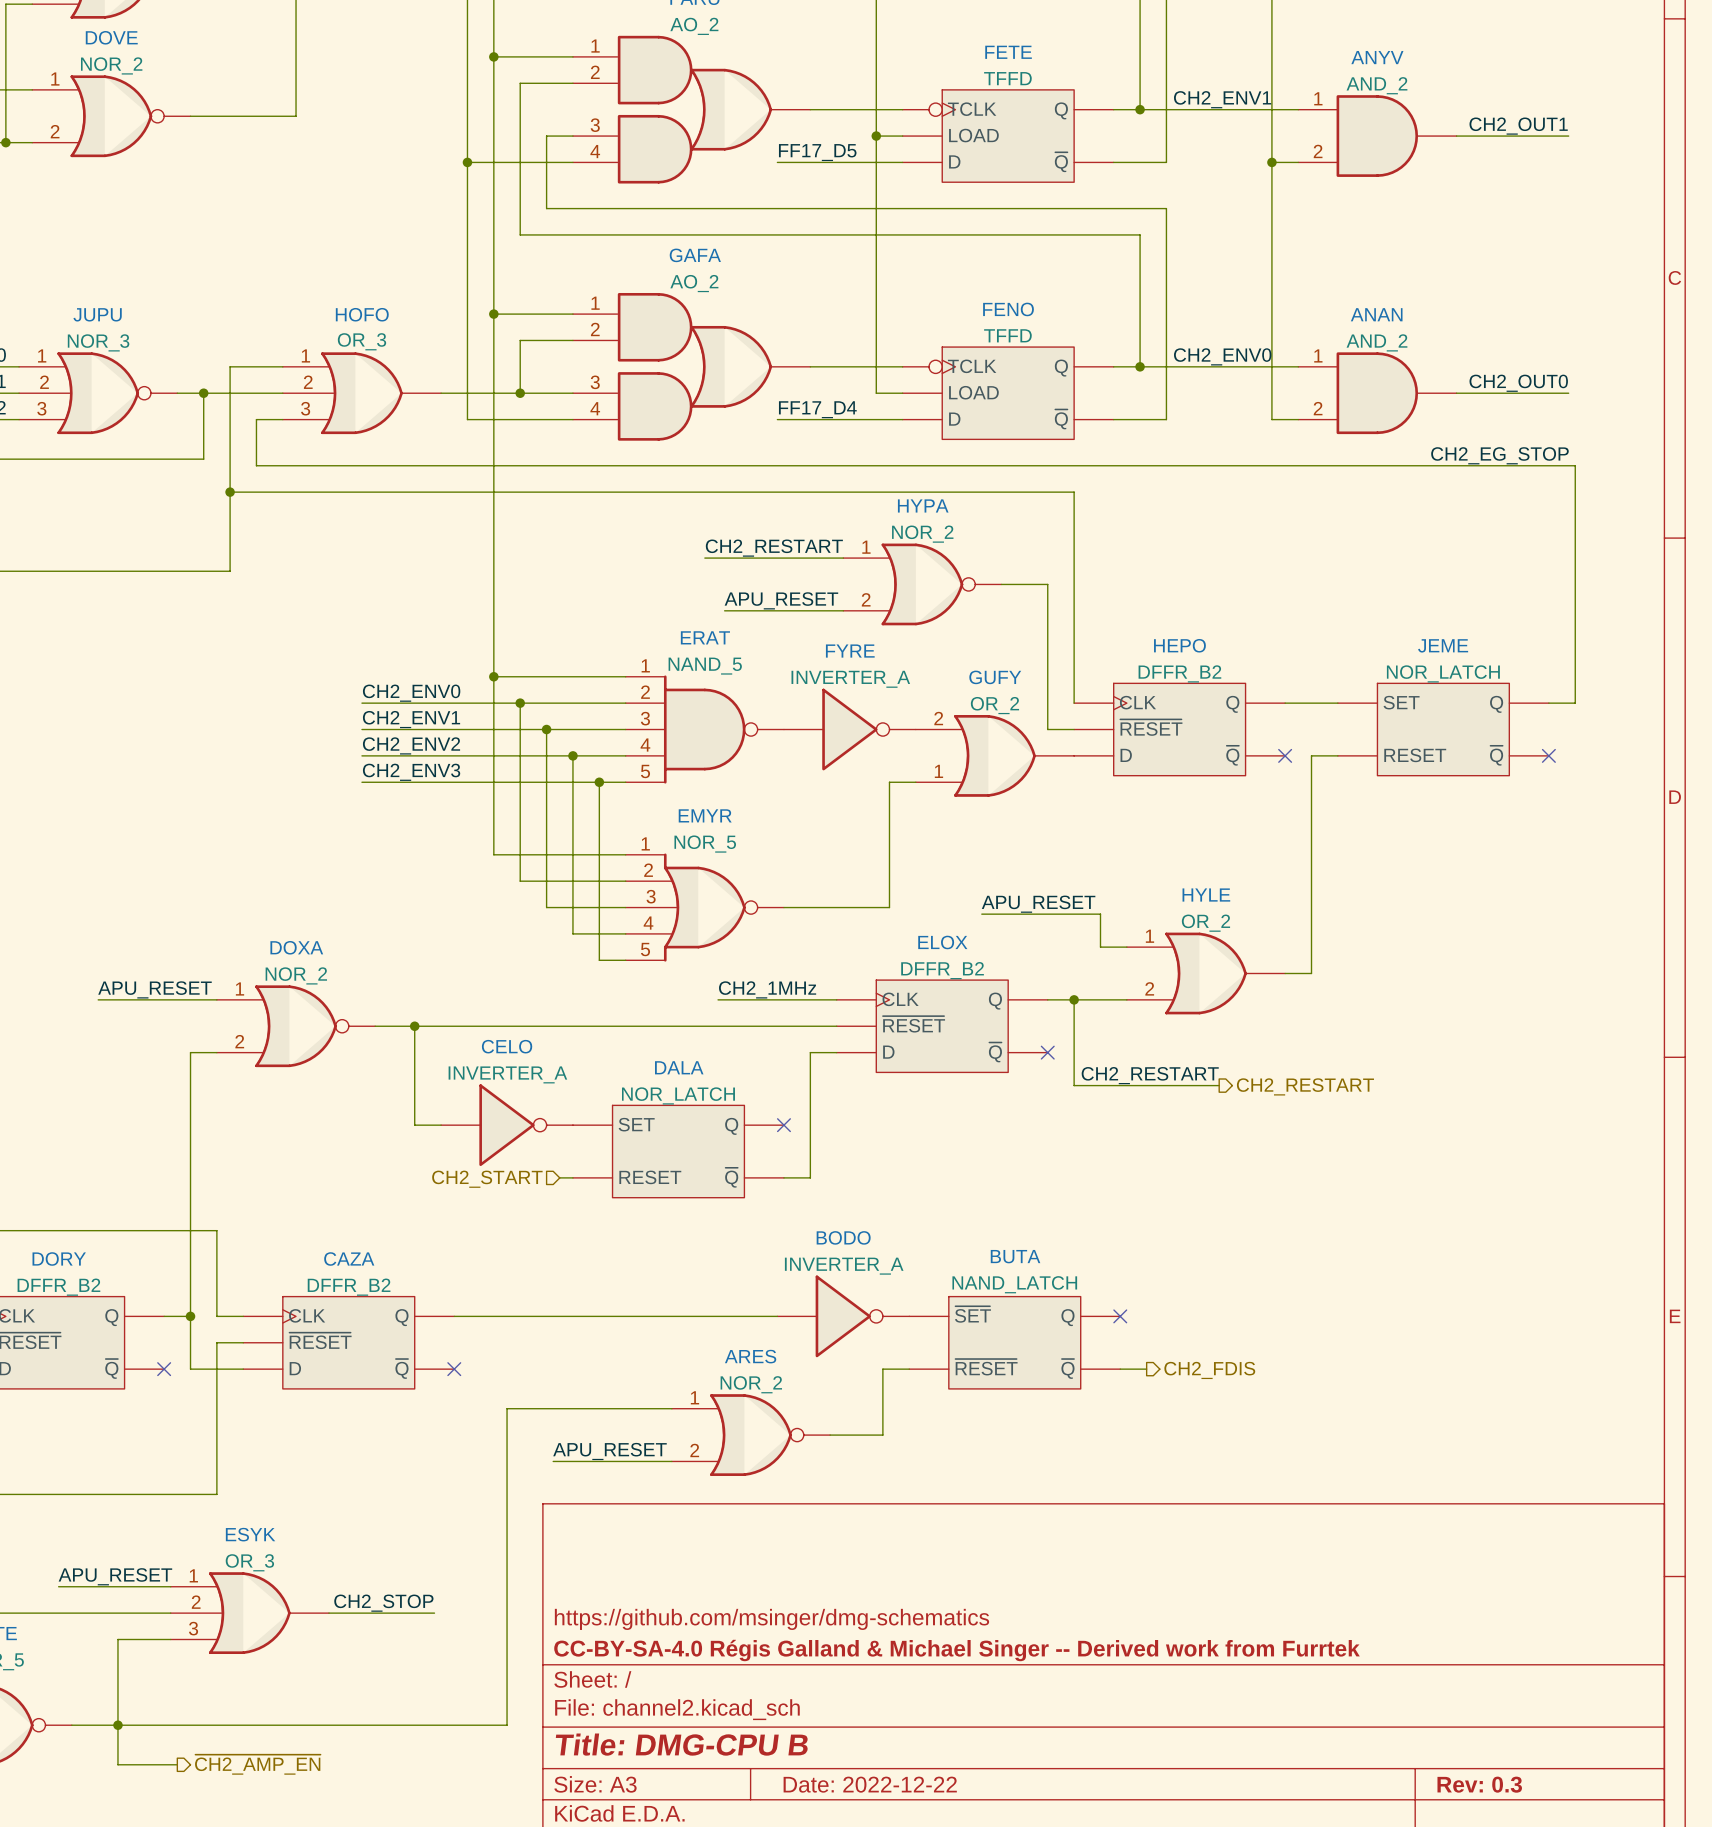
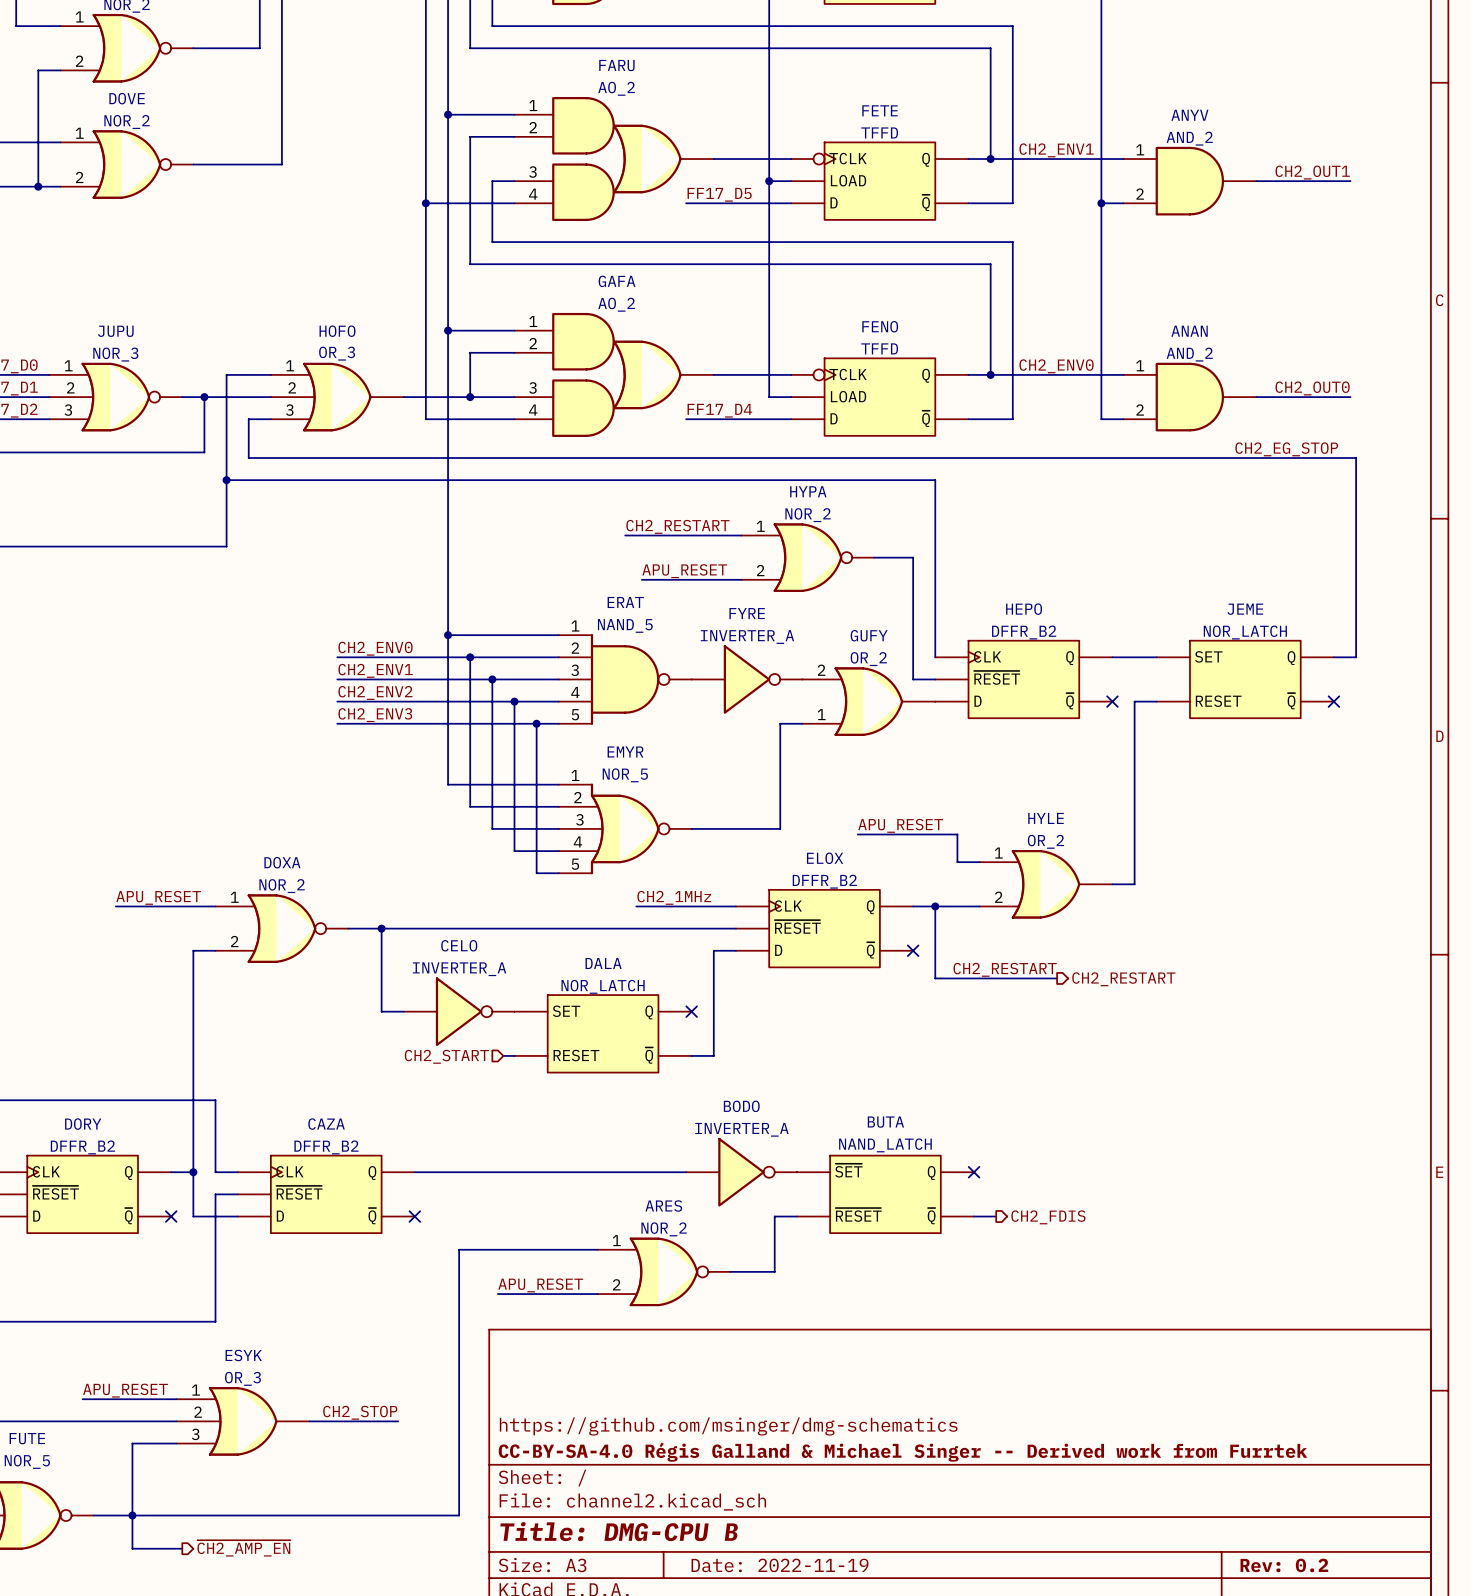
title block: Date: 2022-12-22 (870, 1784) -> Date: 2022-11-19 (780, 1565)
title block: Rev: 0.3 (1479, 1784) -> Rev: 0.2 (1284, 1565)

